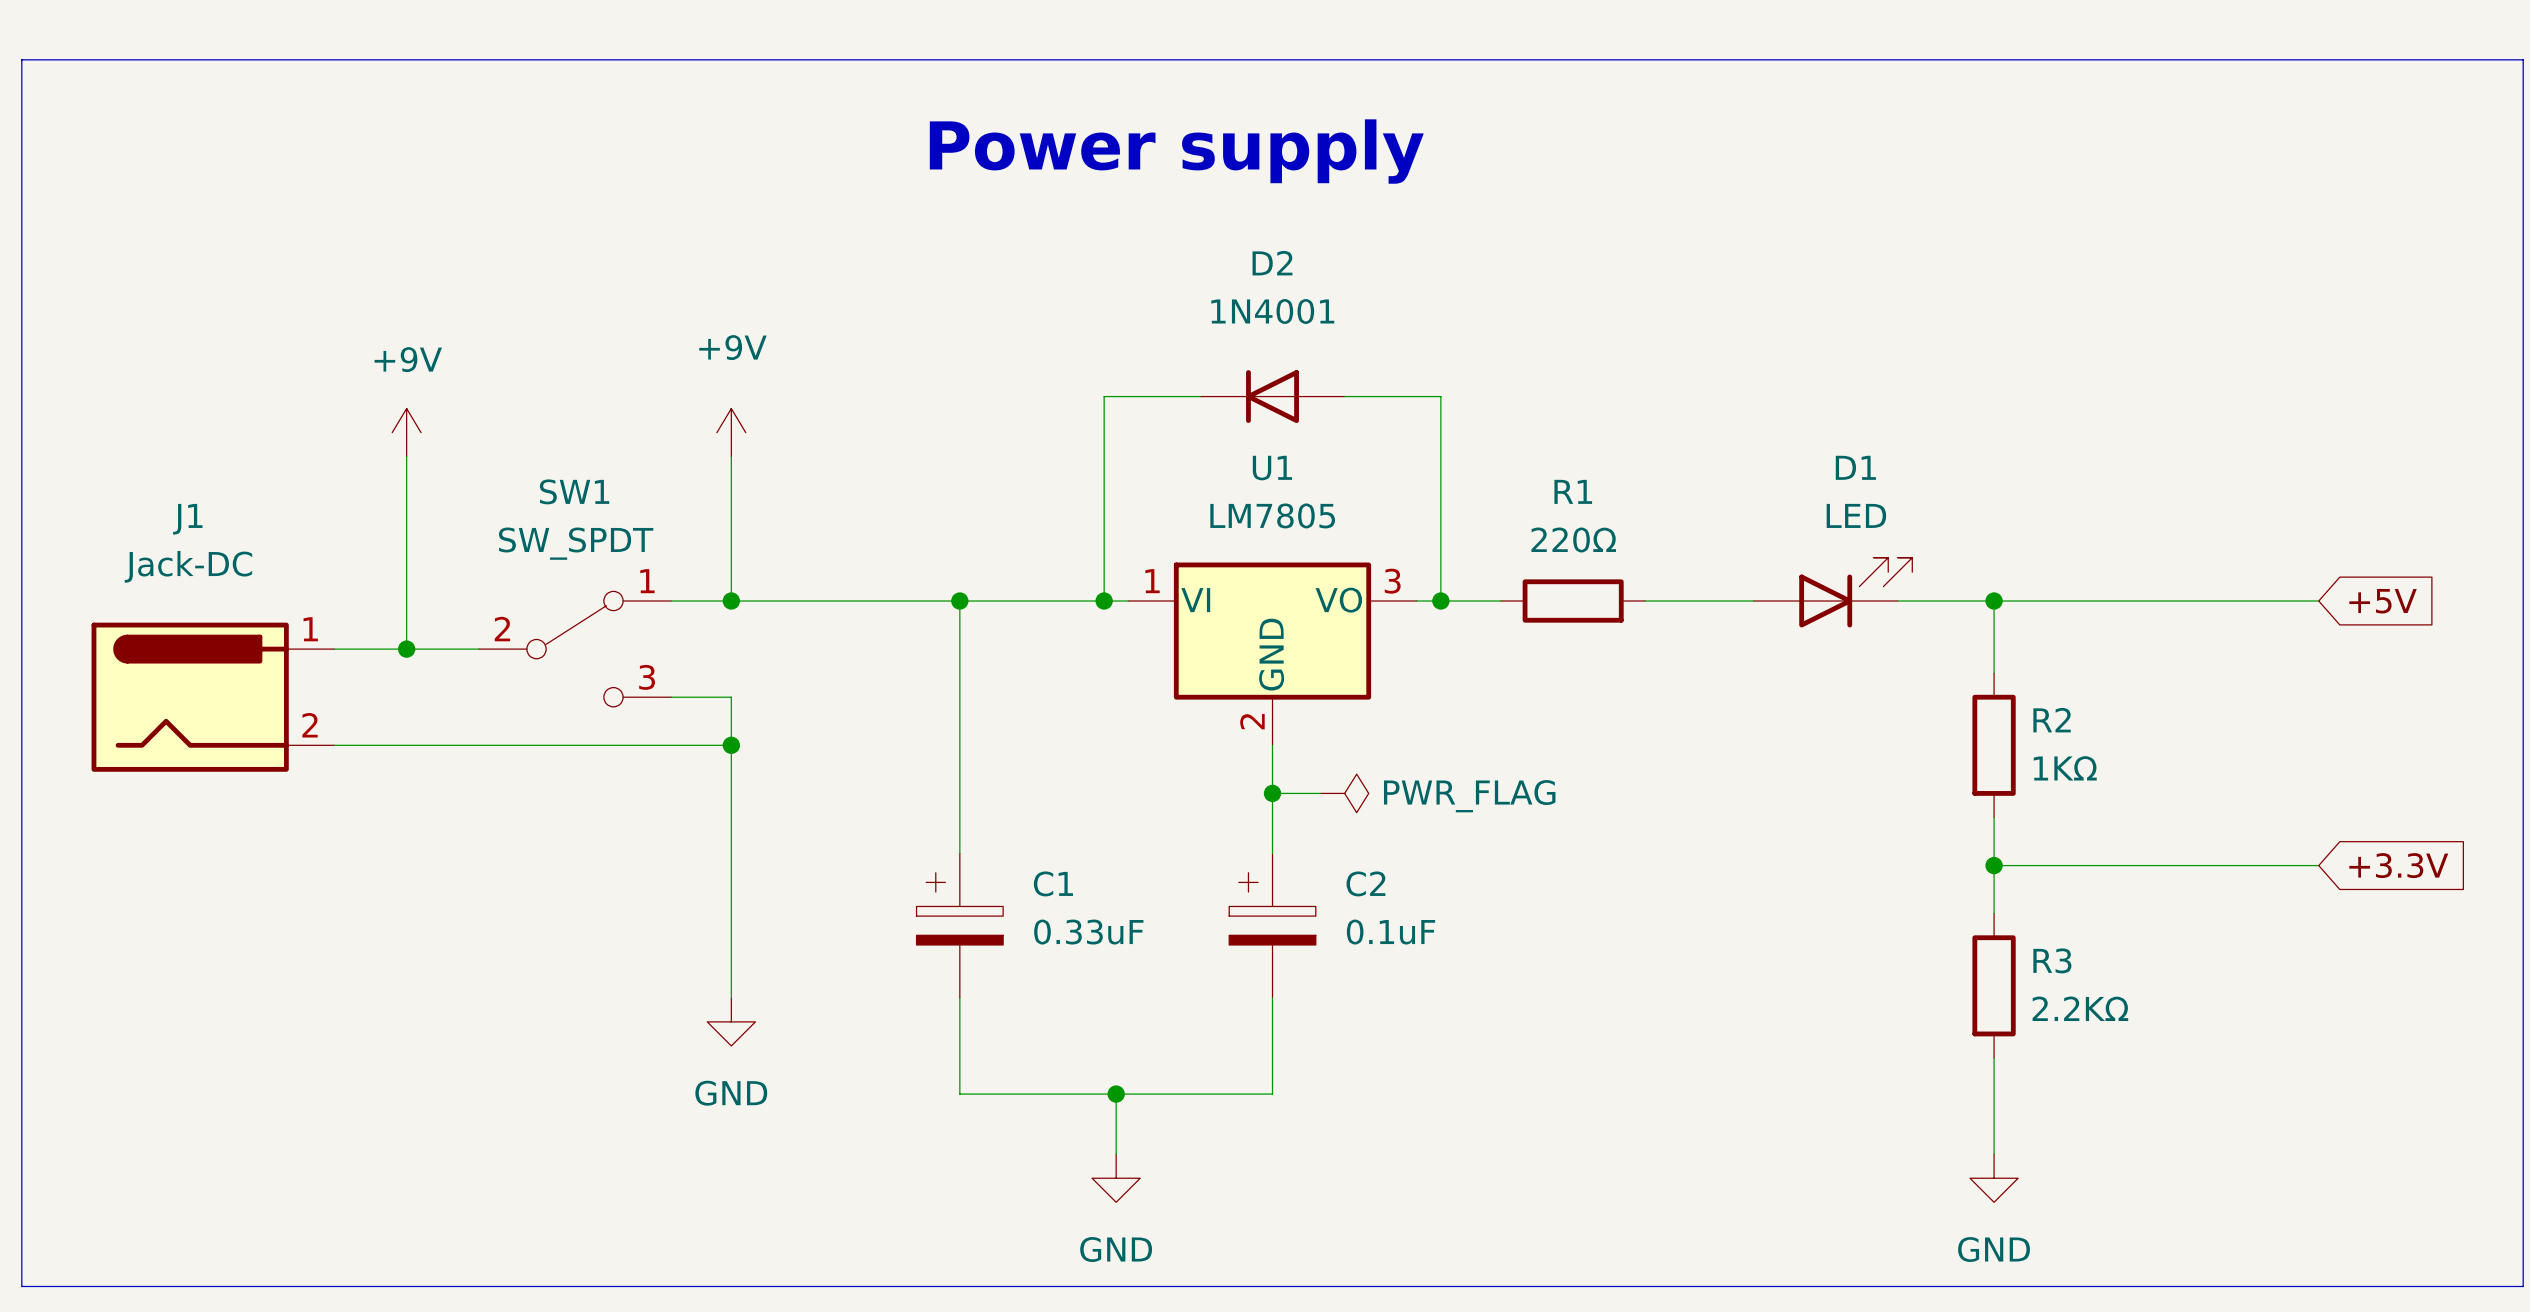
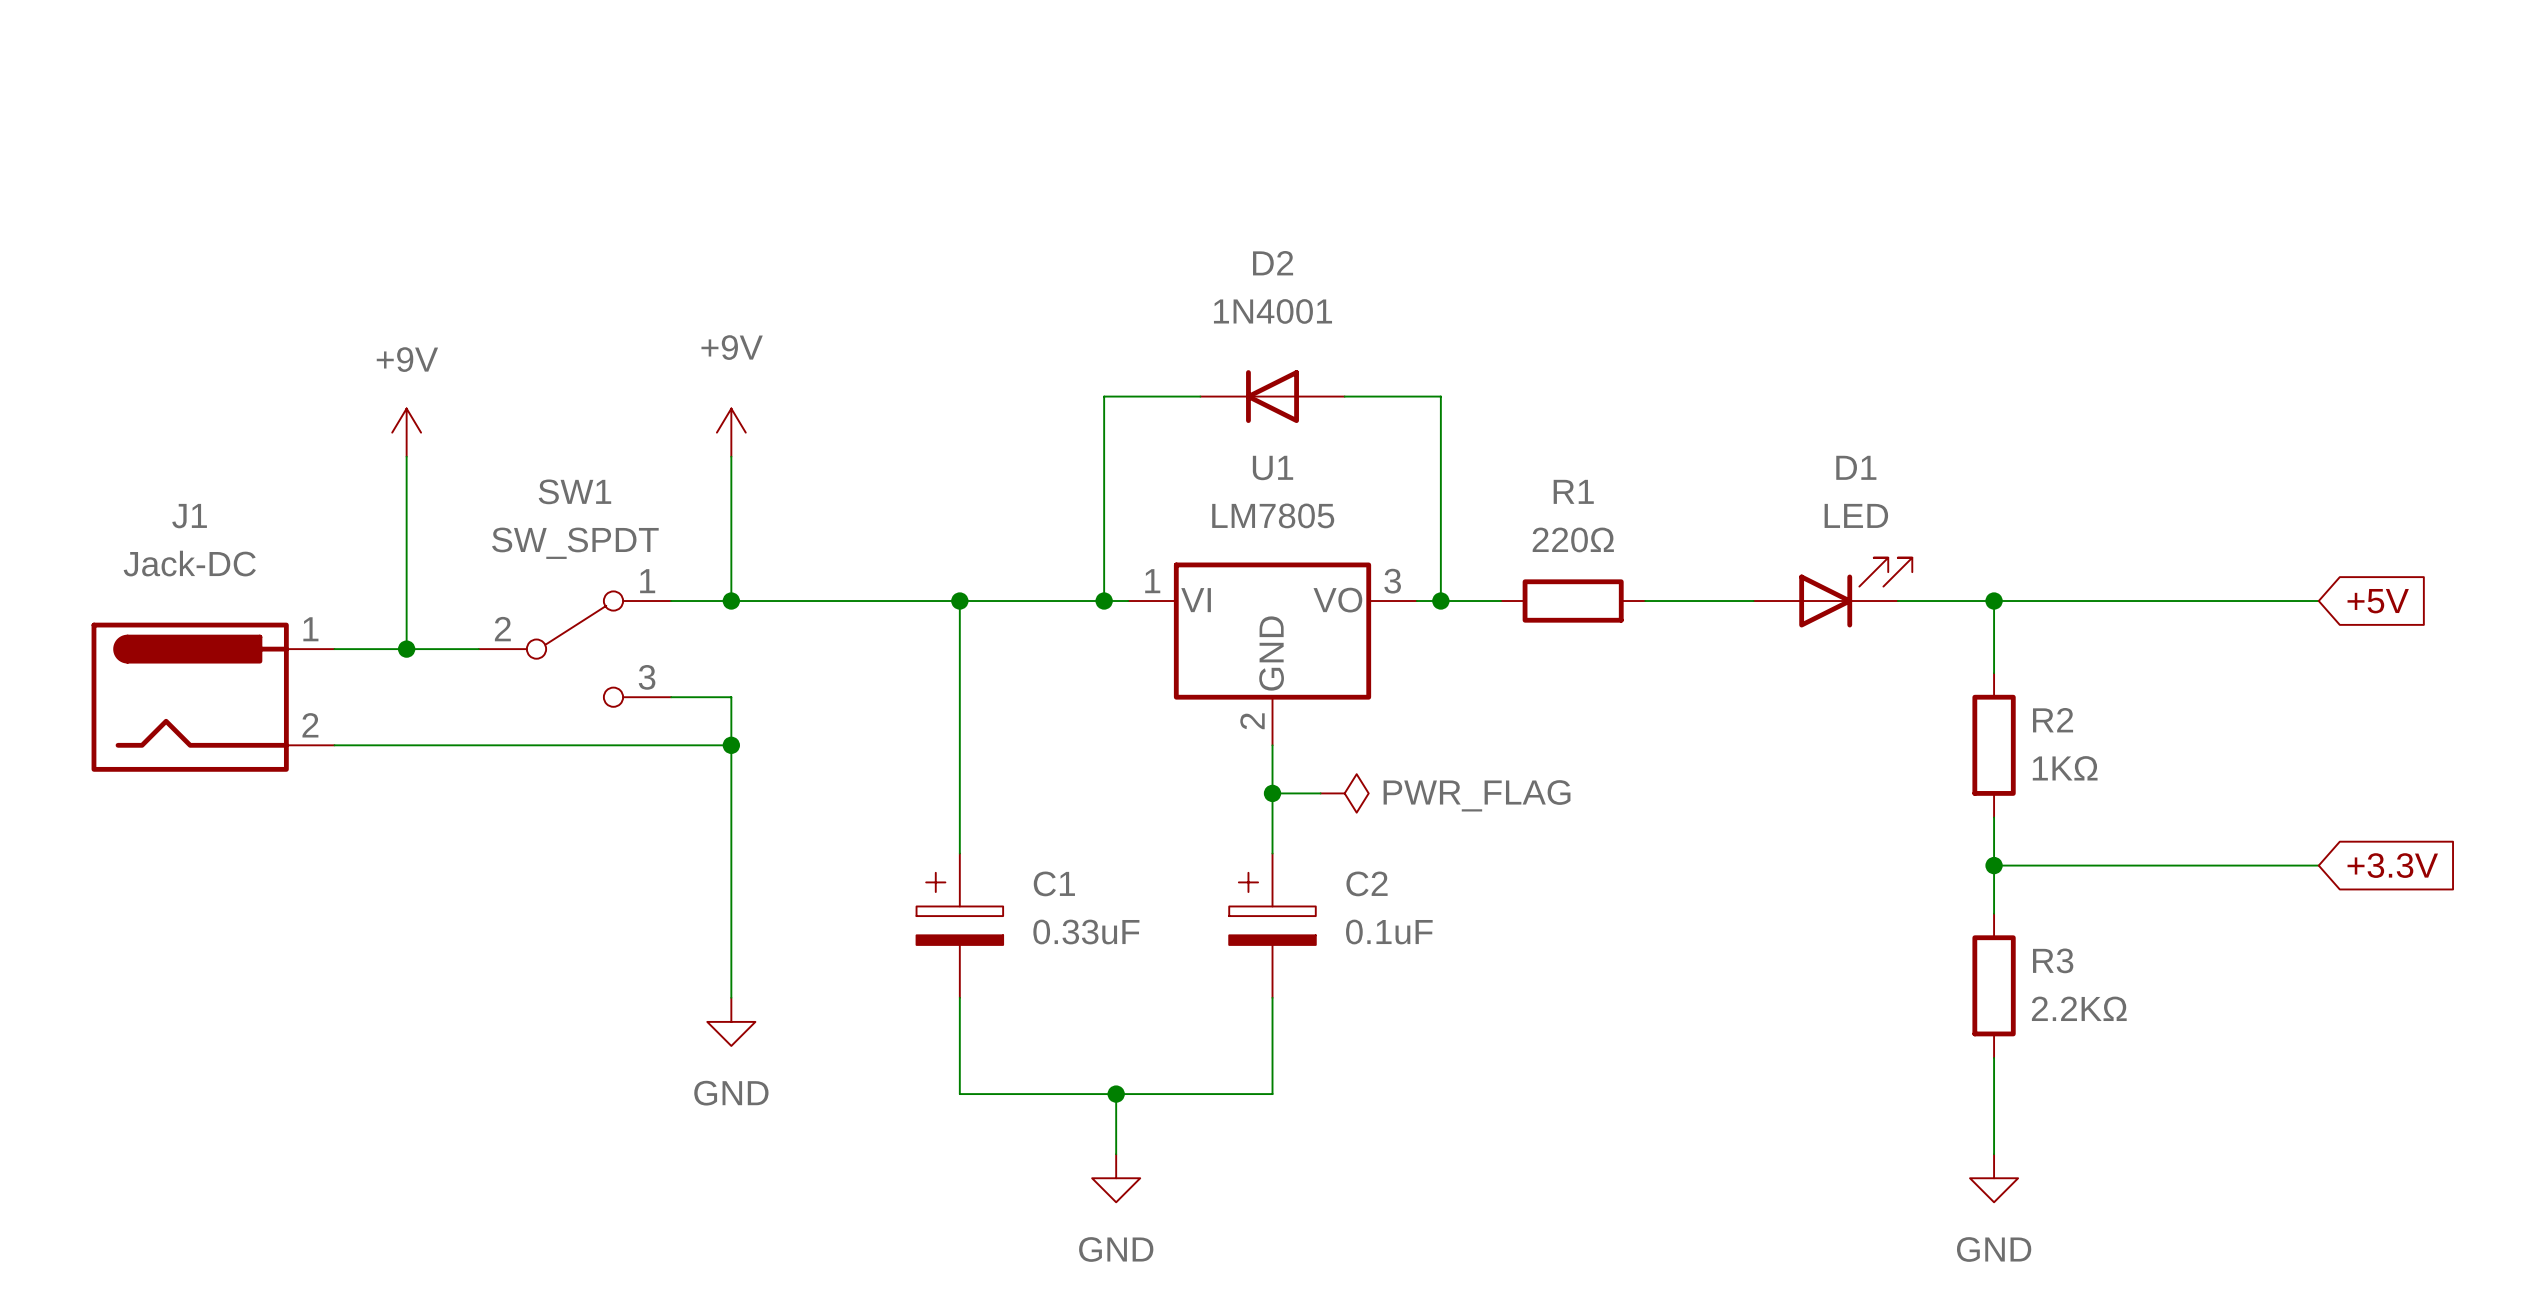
line: (21, 59) (21, 1286) (2523, 1286) (2523, 59) (21, 59) -> none
text: Power supply (1176, 151) -> none

